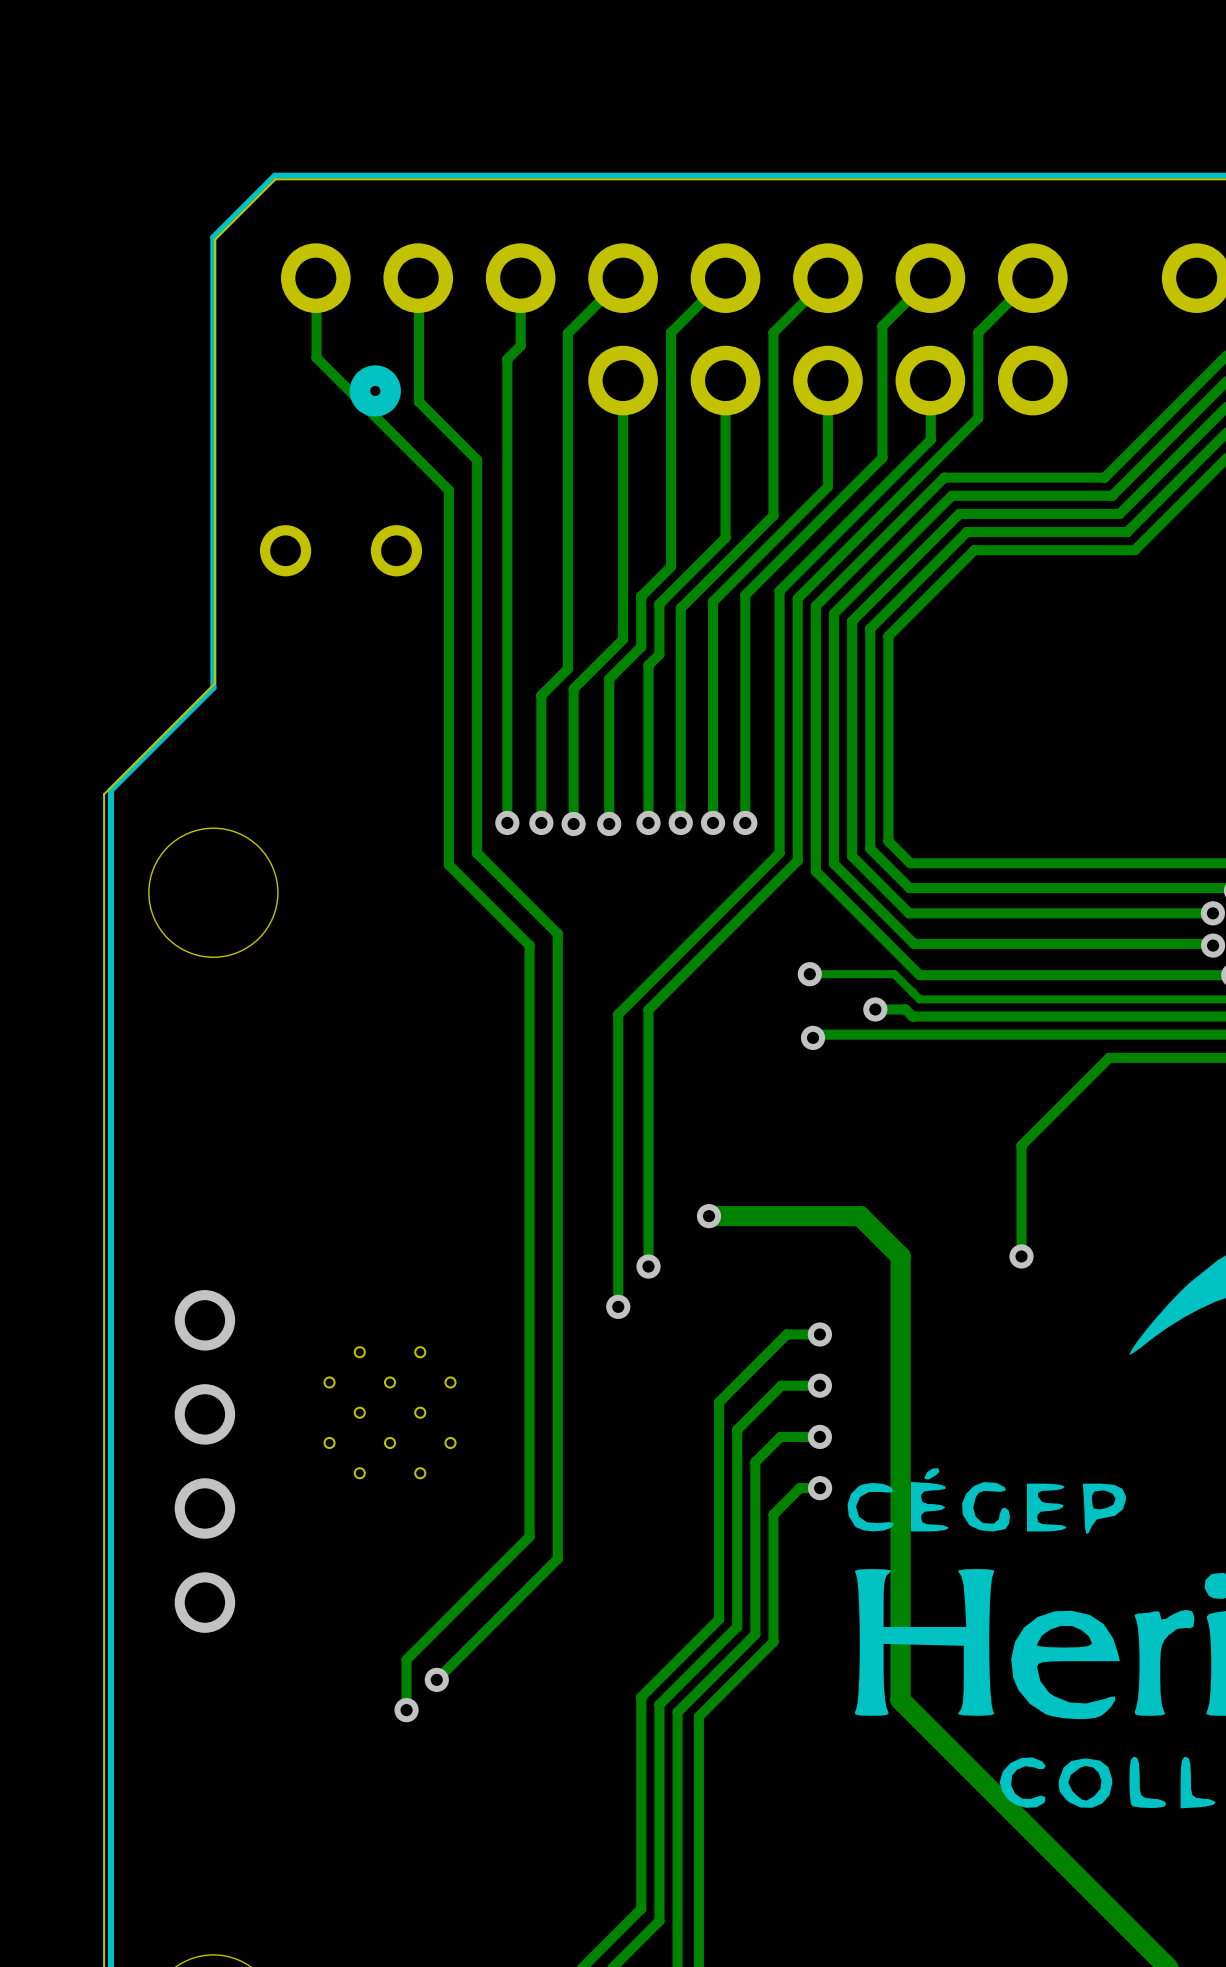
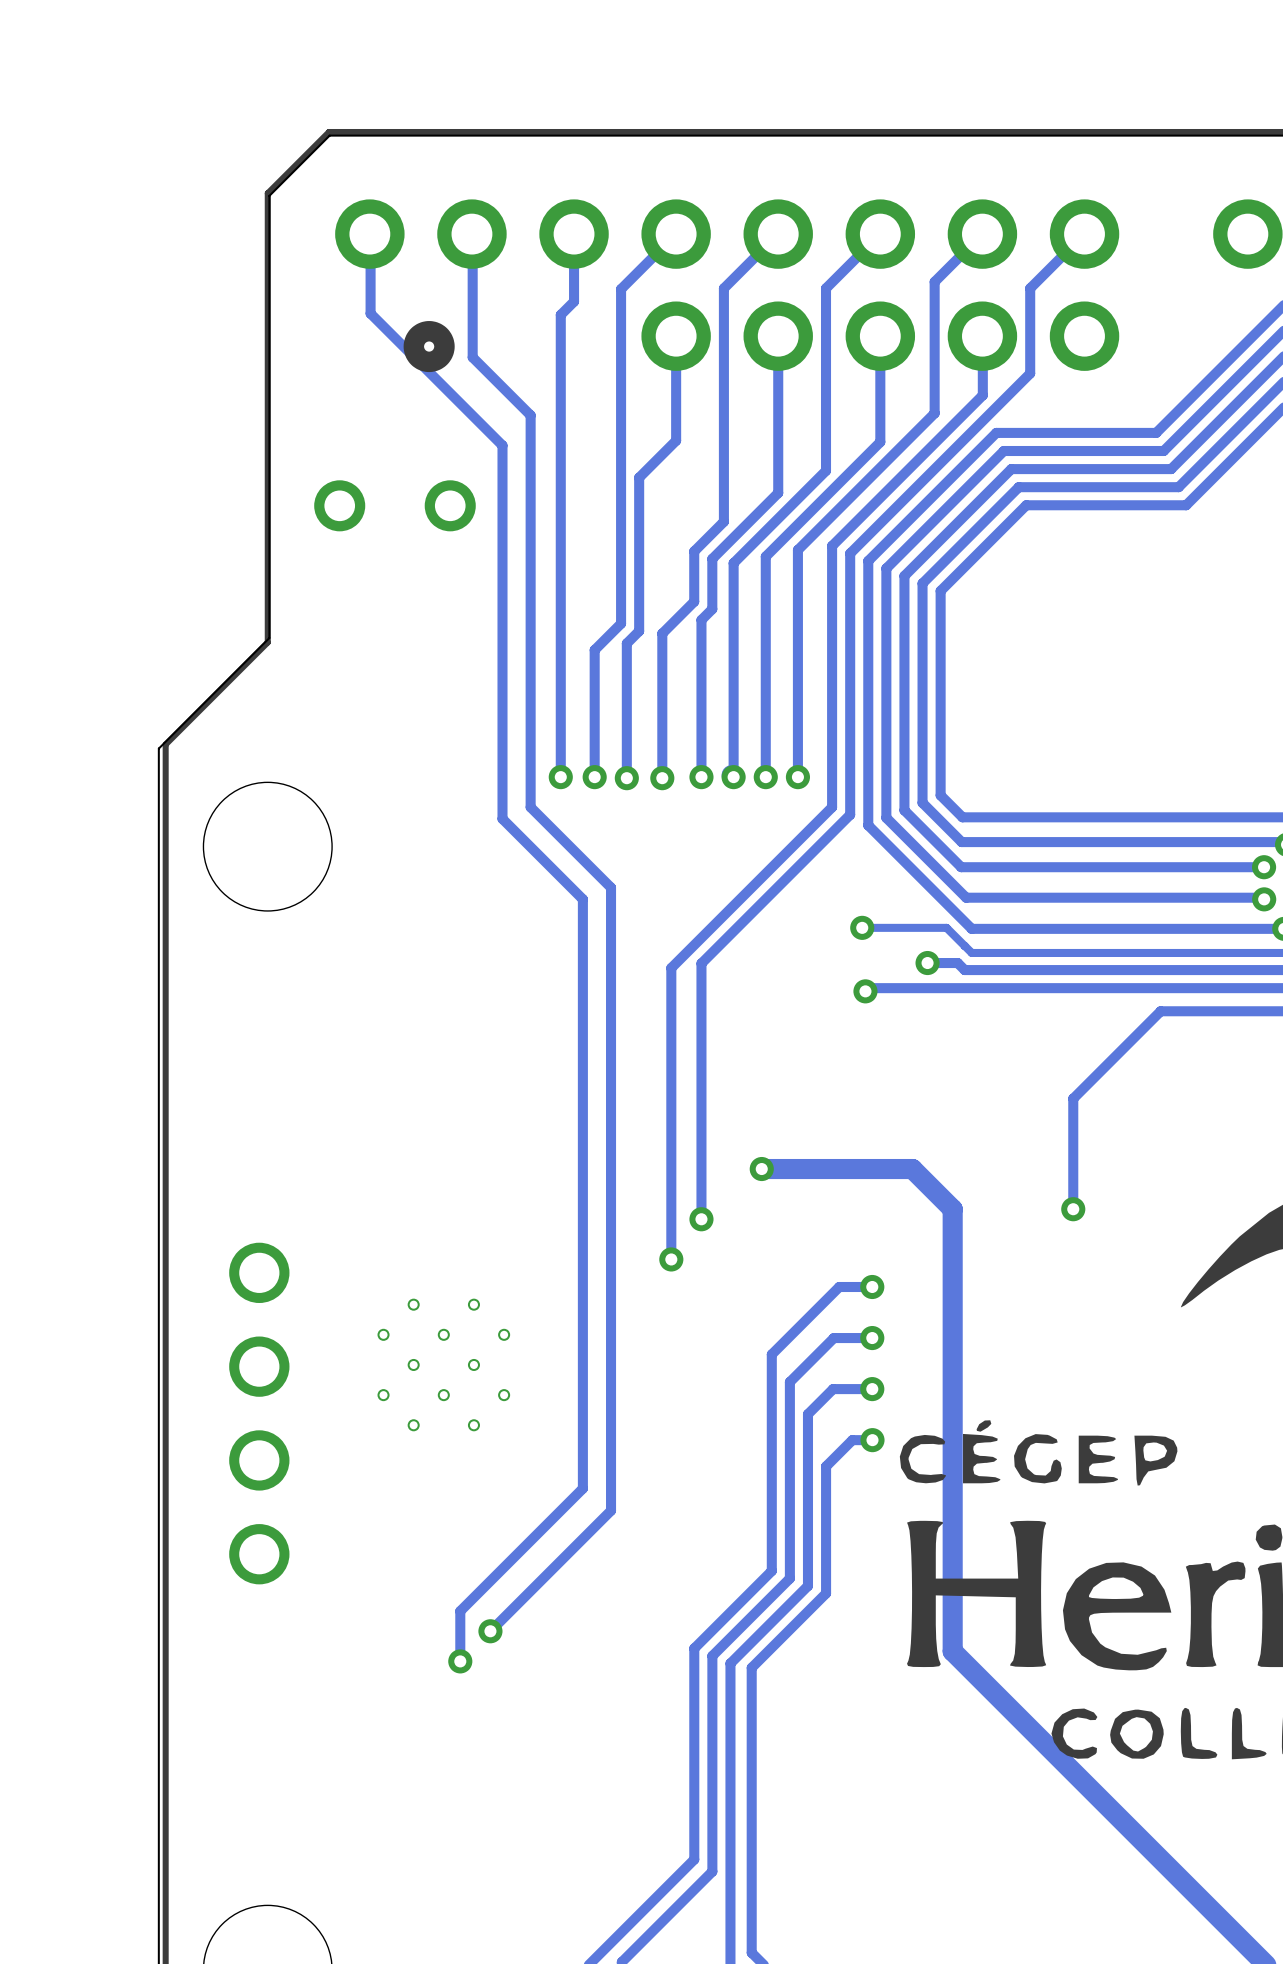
track: (623, 485) (623, 639) (586, 676) -> (676, 440) (639, 477) (639, 631)

